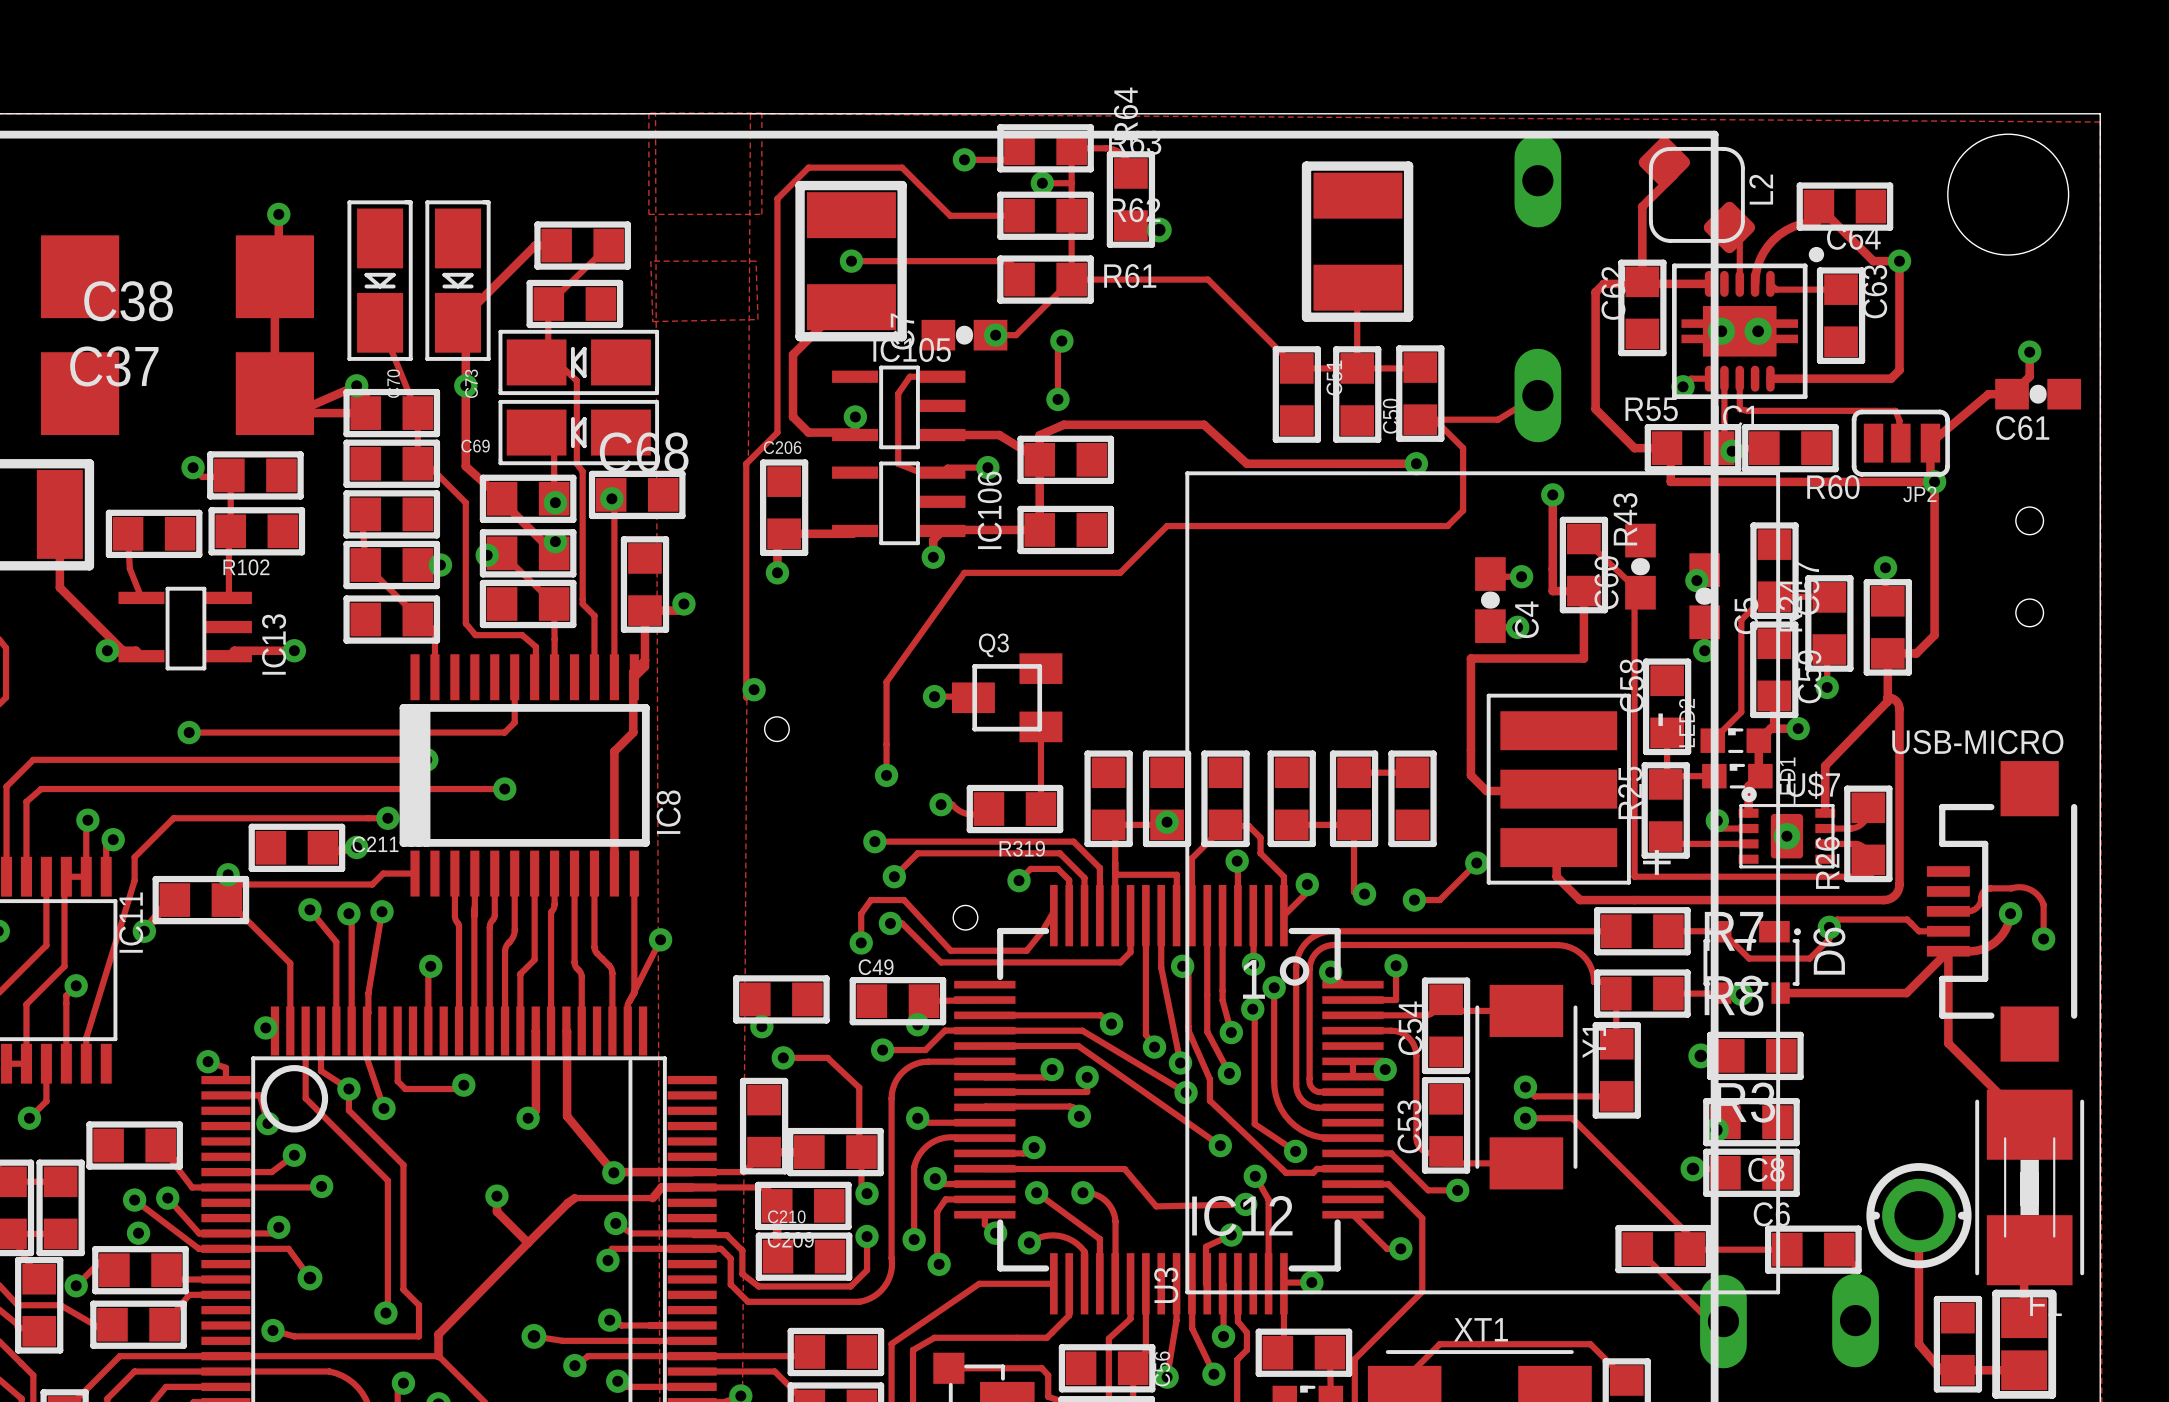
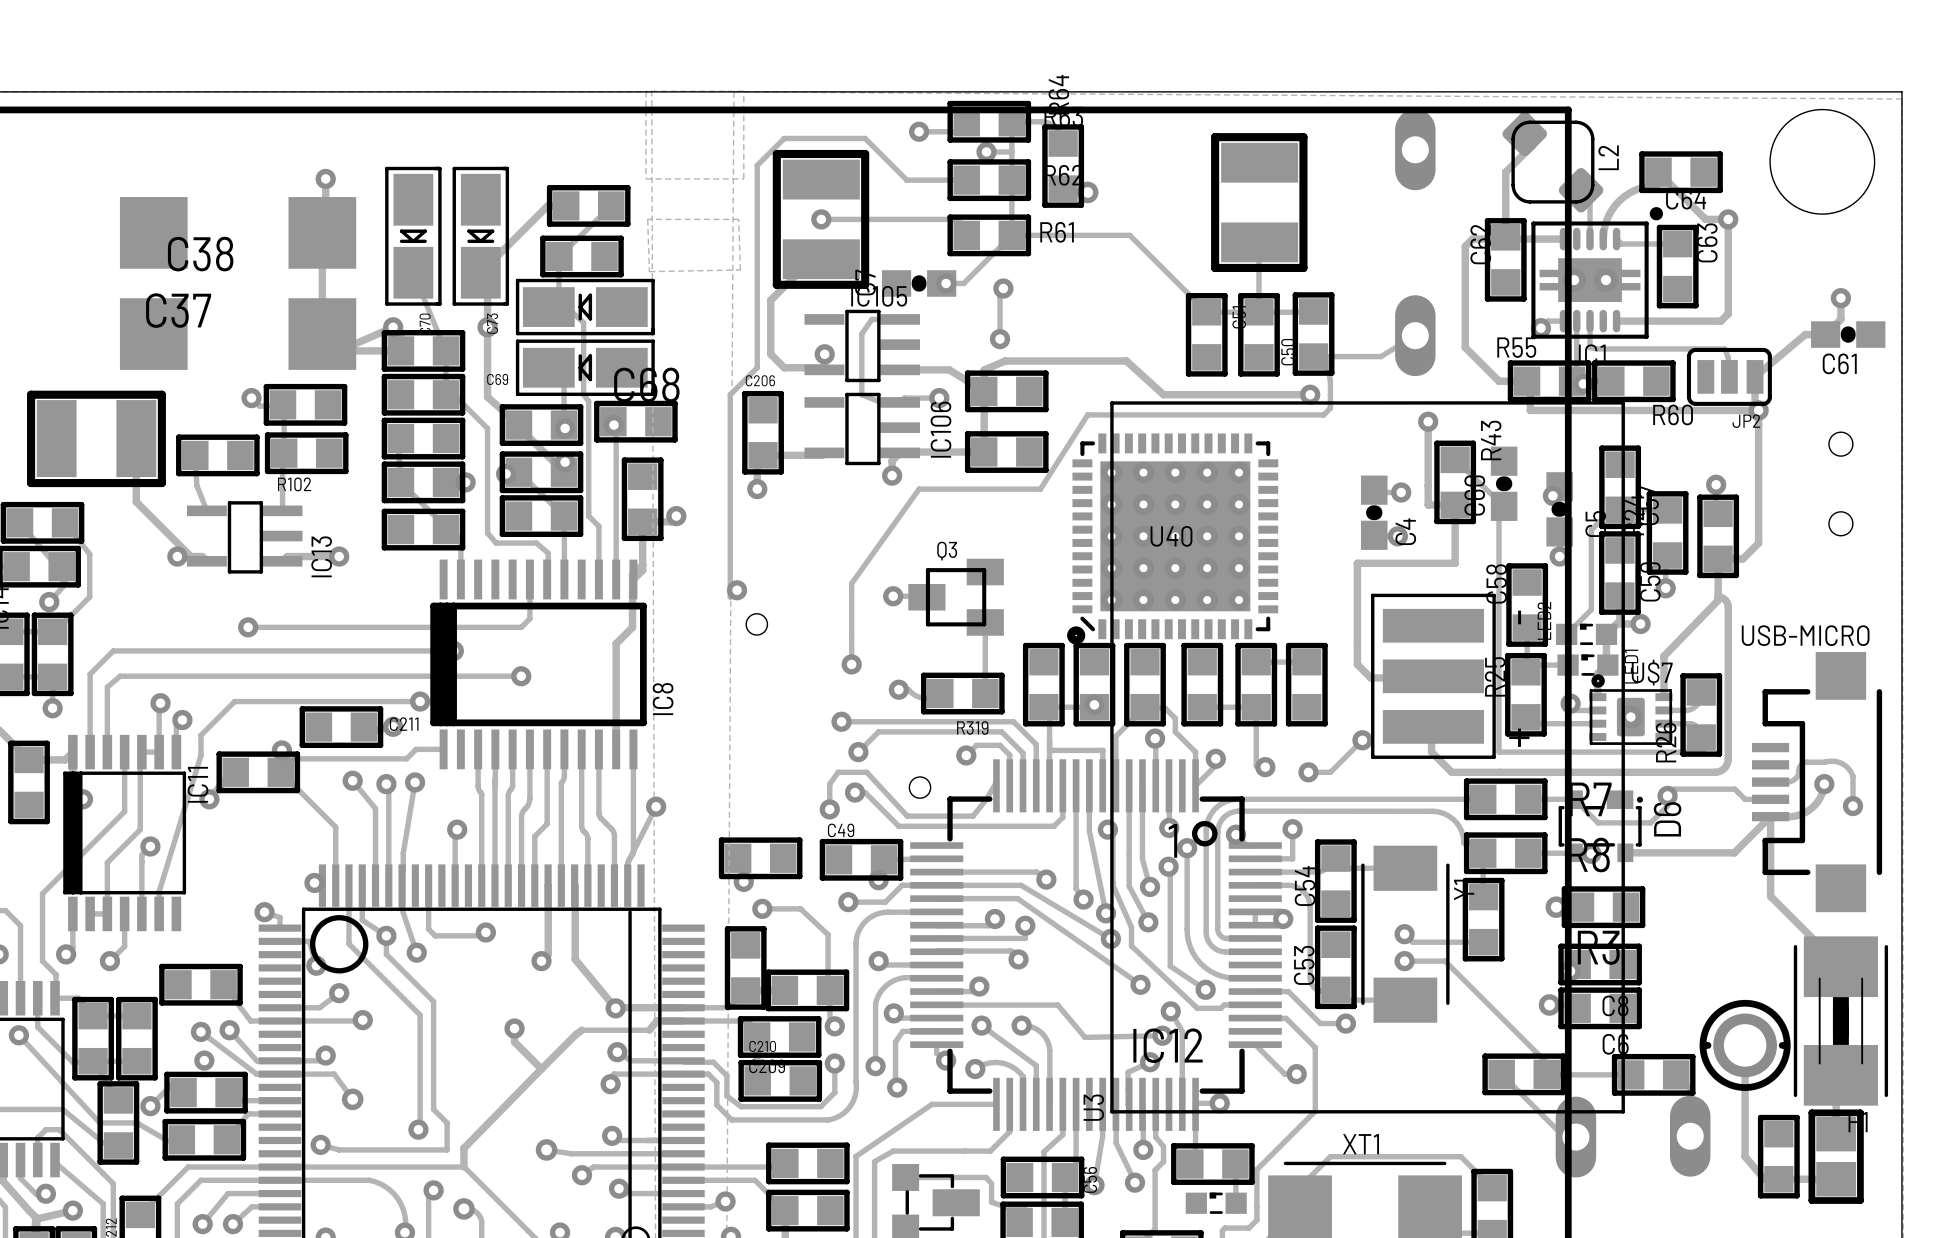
track: (1434, 419) (1463, 448) (1463, 510) (1447, 526) (1167, 526) (1120, 572) (1104, 572) -> (1326, 356) (1330, 381) (1330, 408) (1323, 414) (1087, 414) (1040, 489)
U40: none -> (1172, 539)

